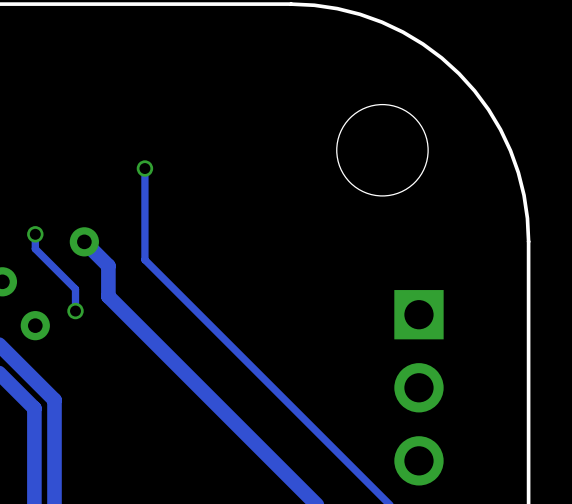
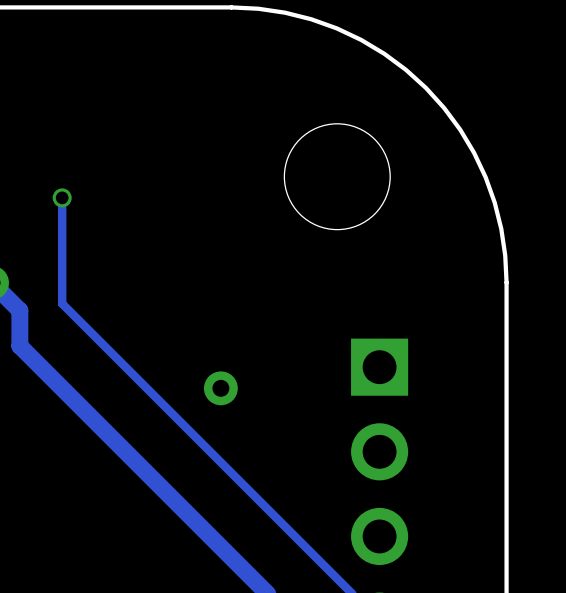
via: none -> (220, 388)

